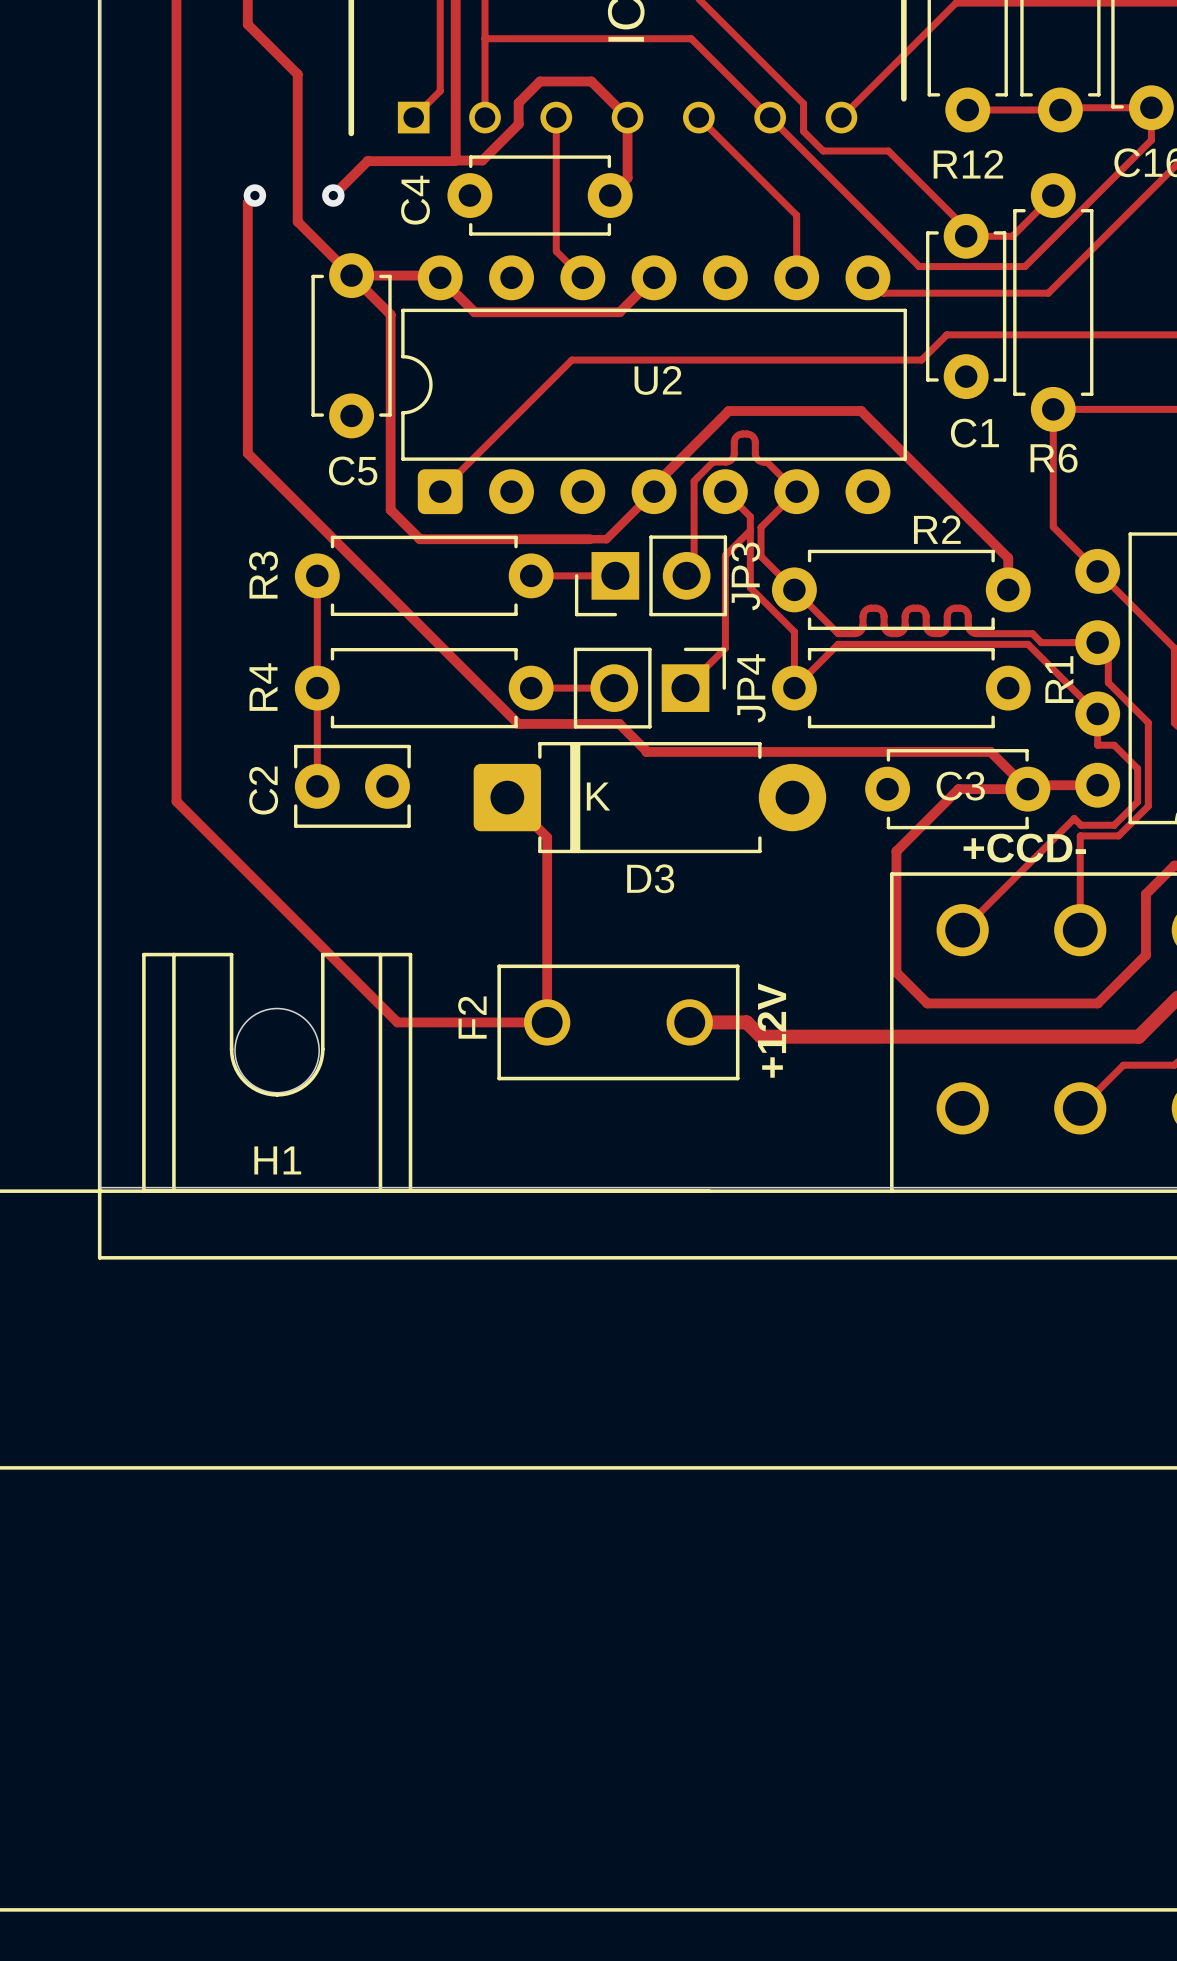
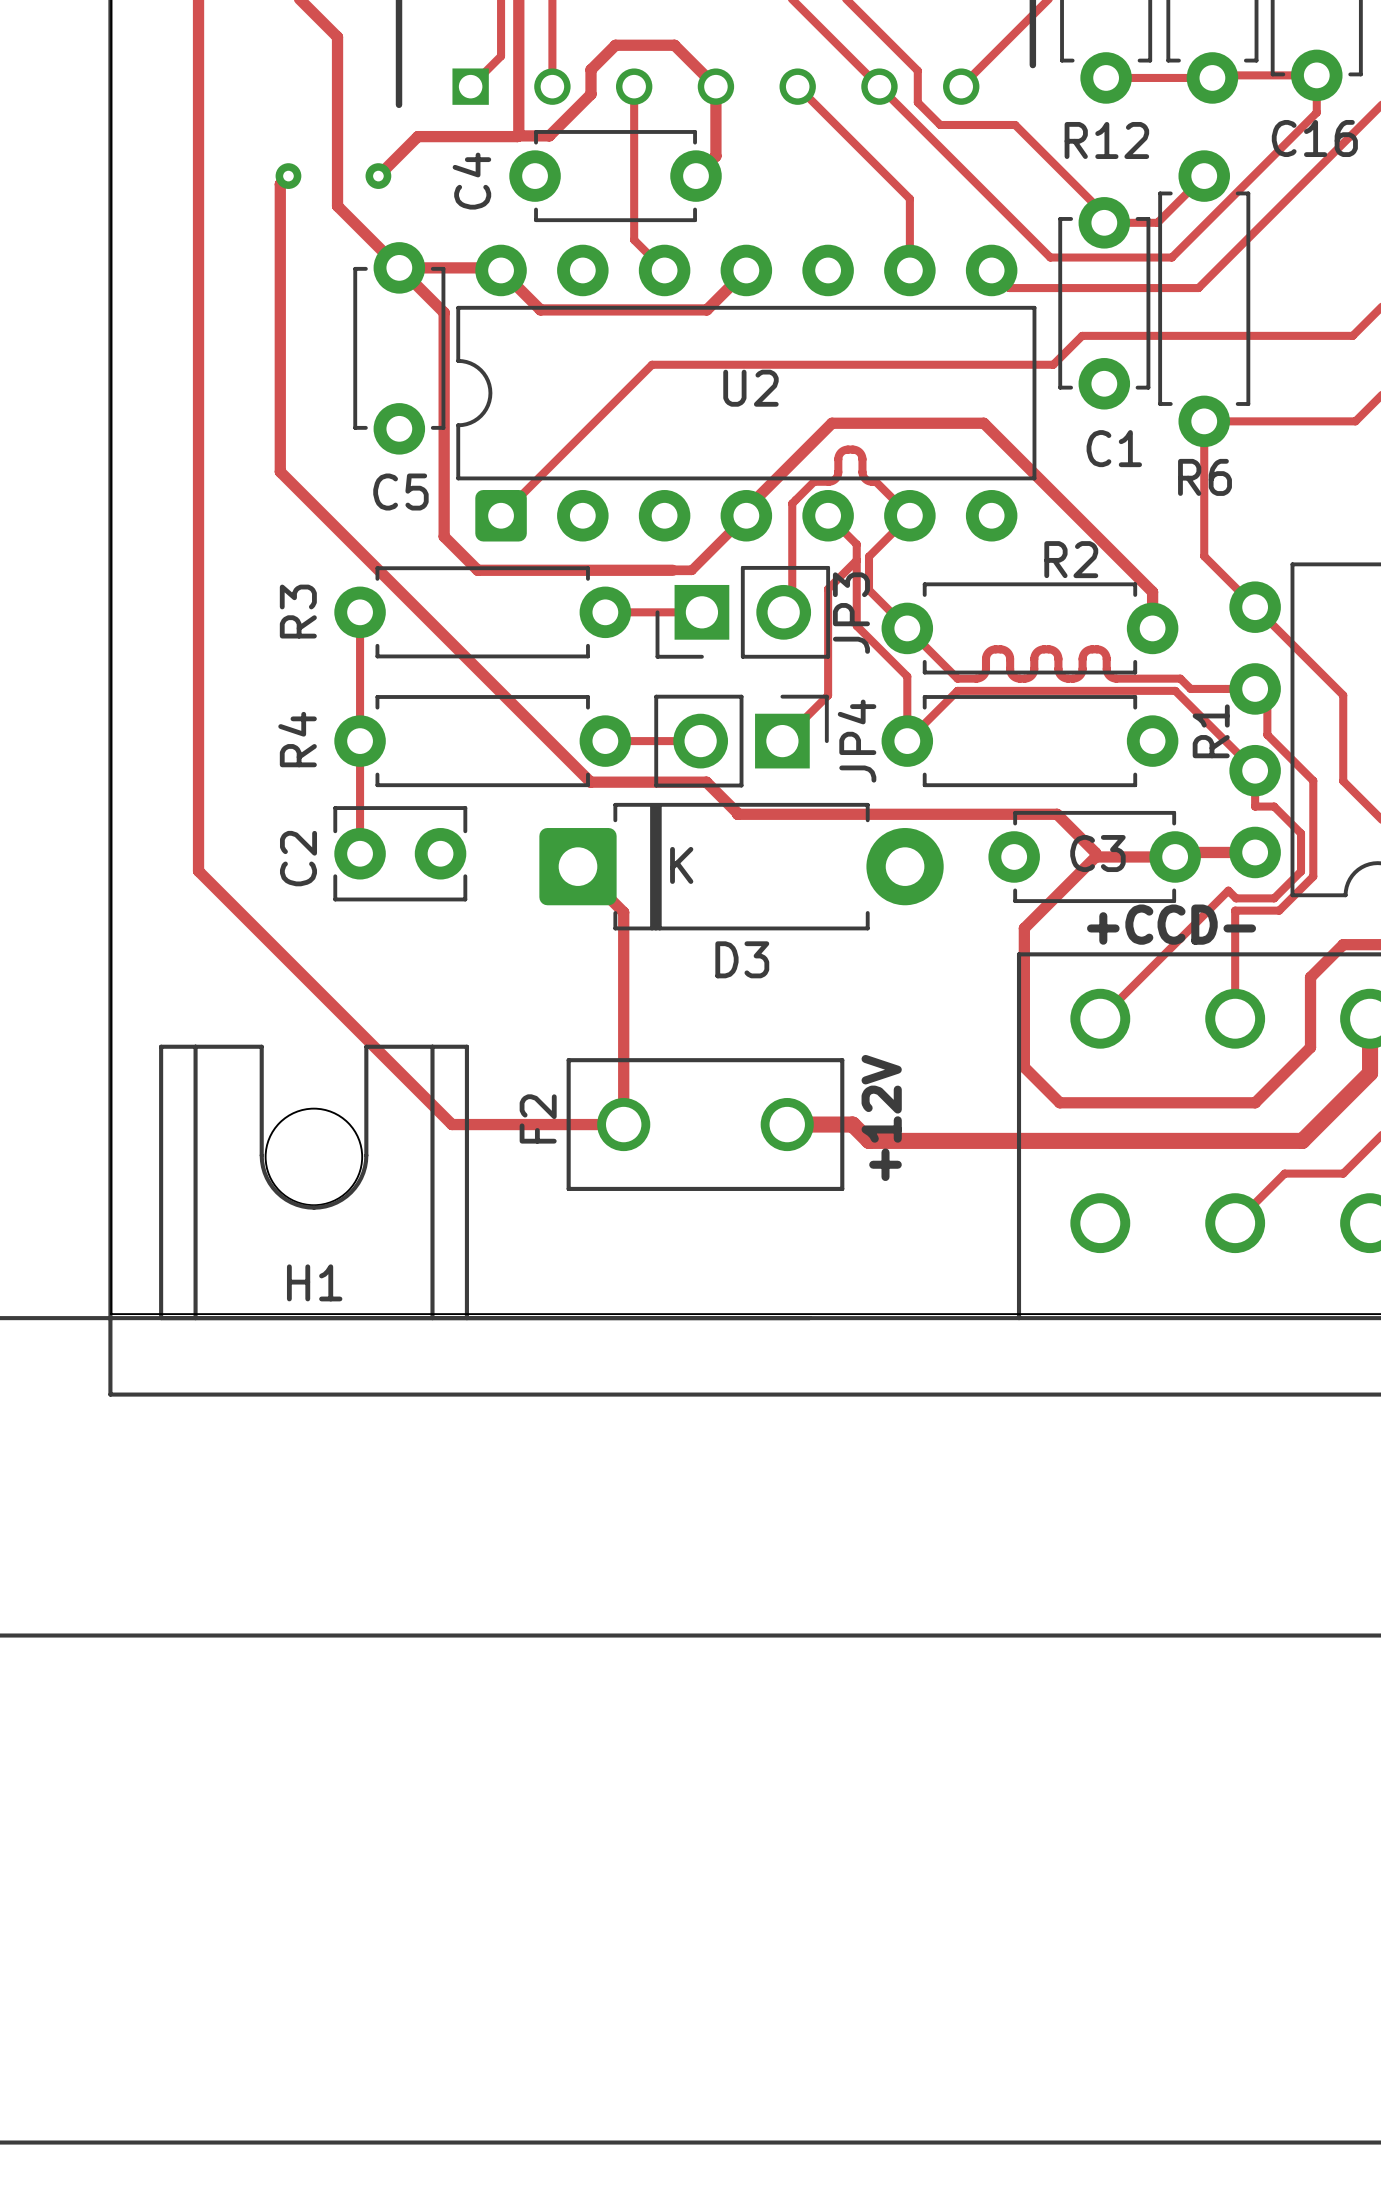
track: (924, 751) (990, 751) (1027, 789) -> (1057, 814) (1095, 852) (1095, 856)

